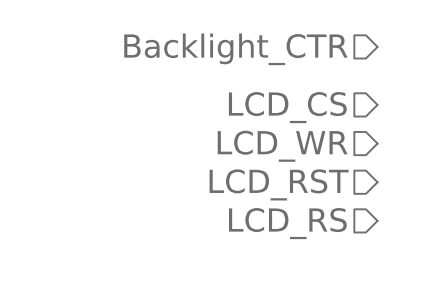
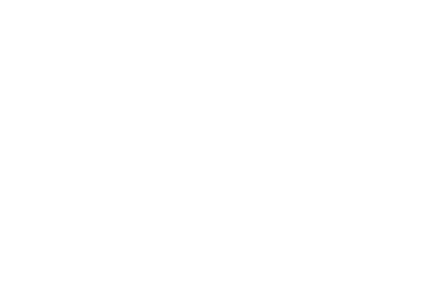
hierarchical label: Backlight_CTR (235, 49) -> none
hierarchical label: LCD_CS (287, 107) -> none
hierarchical label: LCD_WR (282, 146) -> none
hierarchical label: LCD_RST (279, 184) -> none
hierarchical label: LCD_RS (287, 223) -> none

